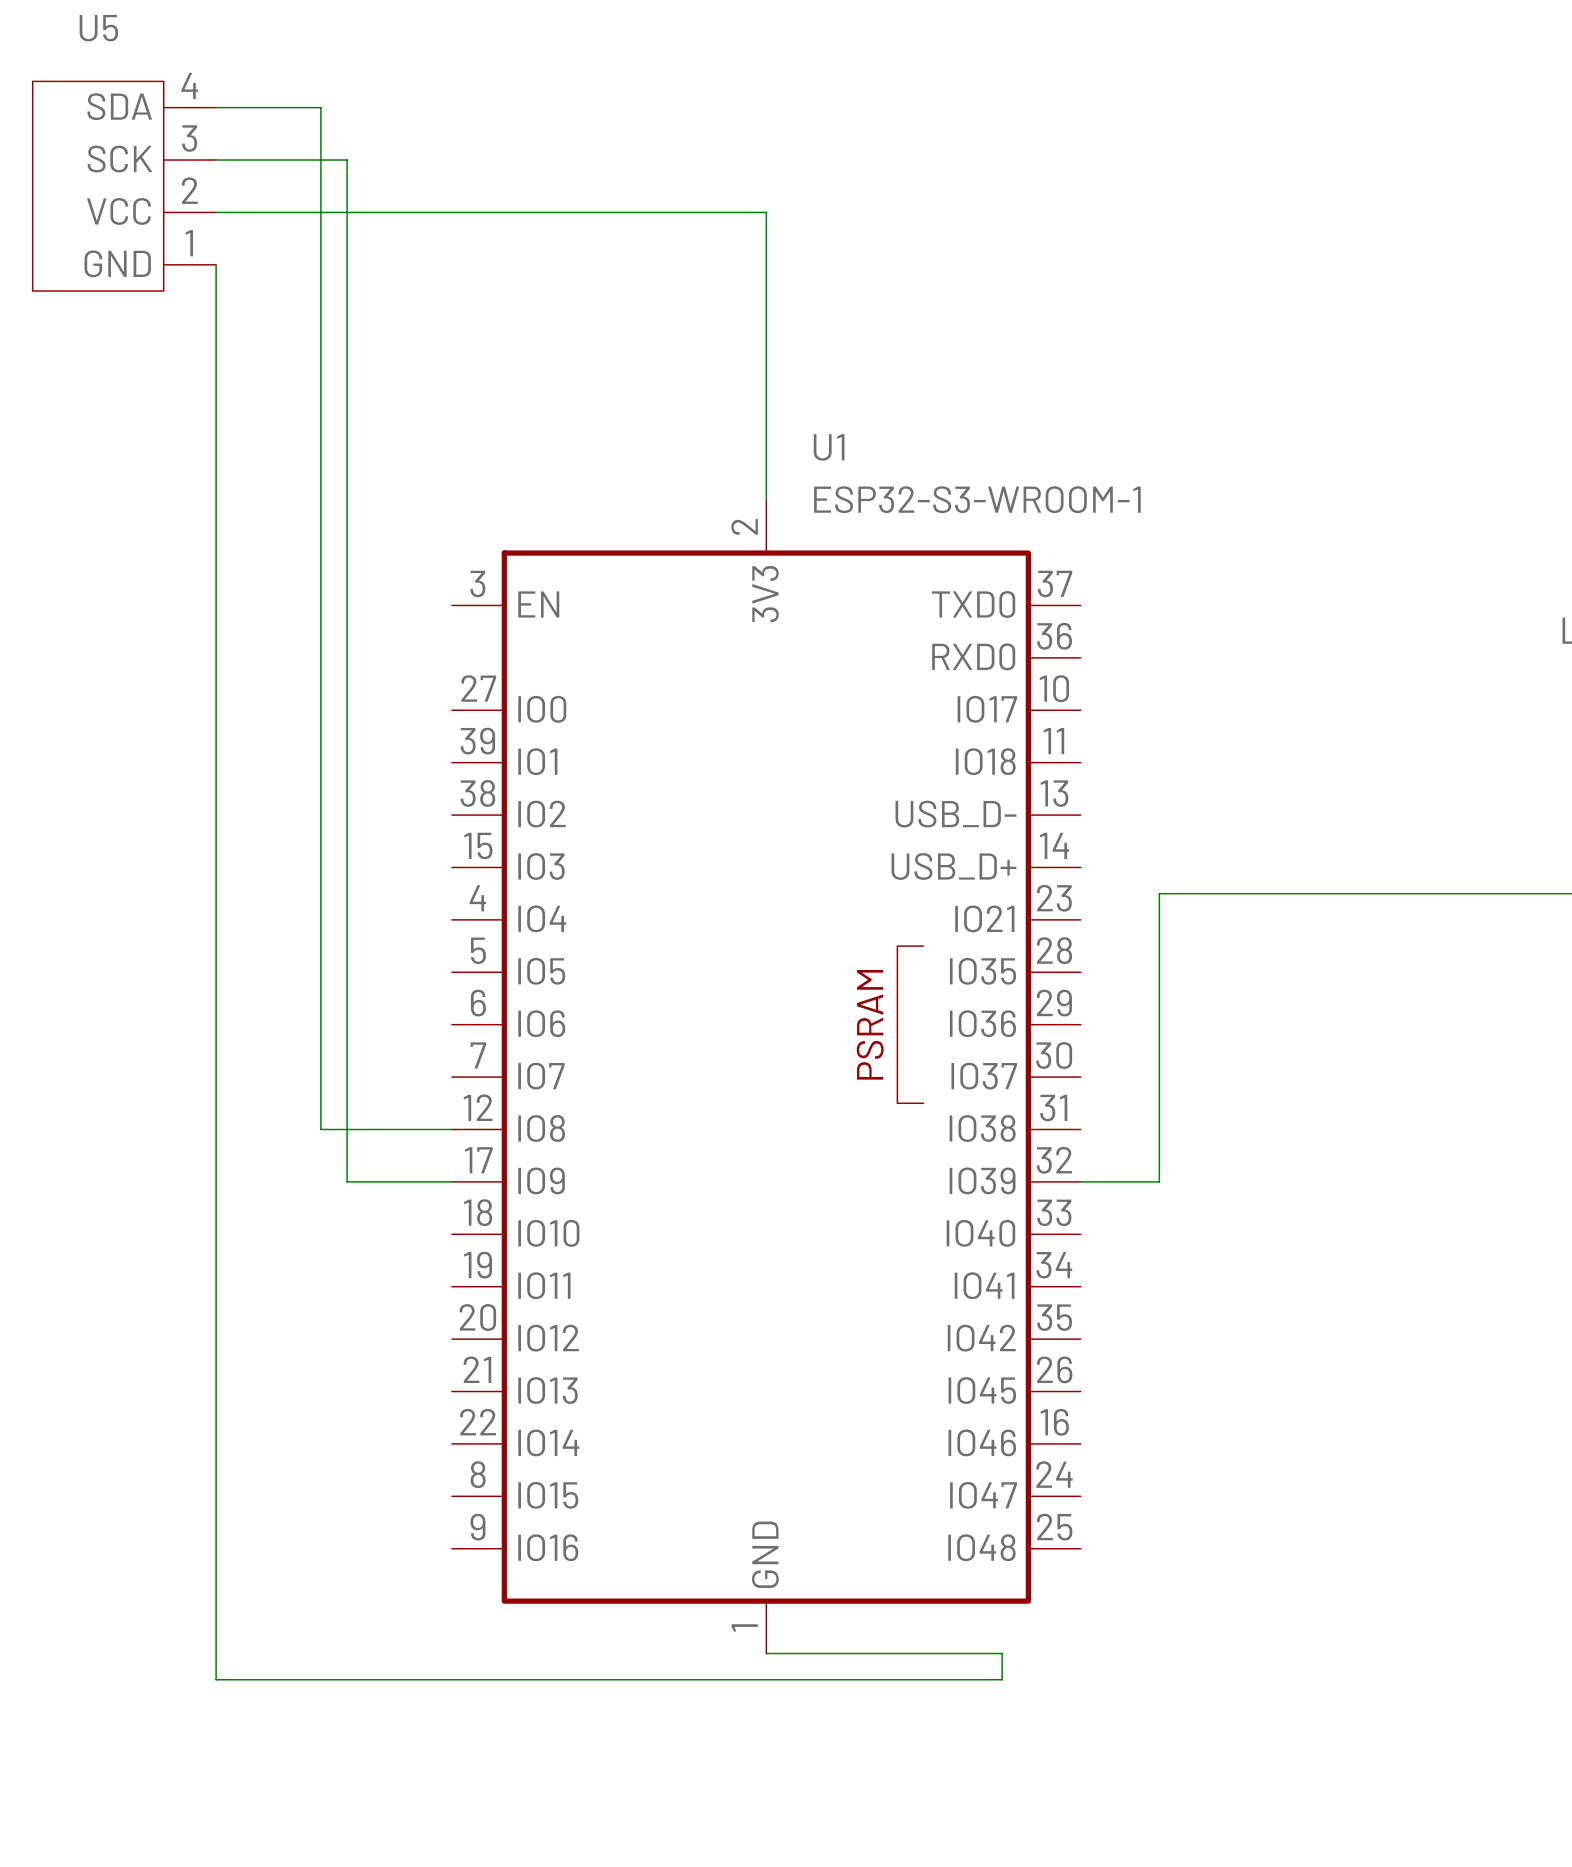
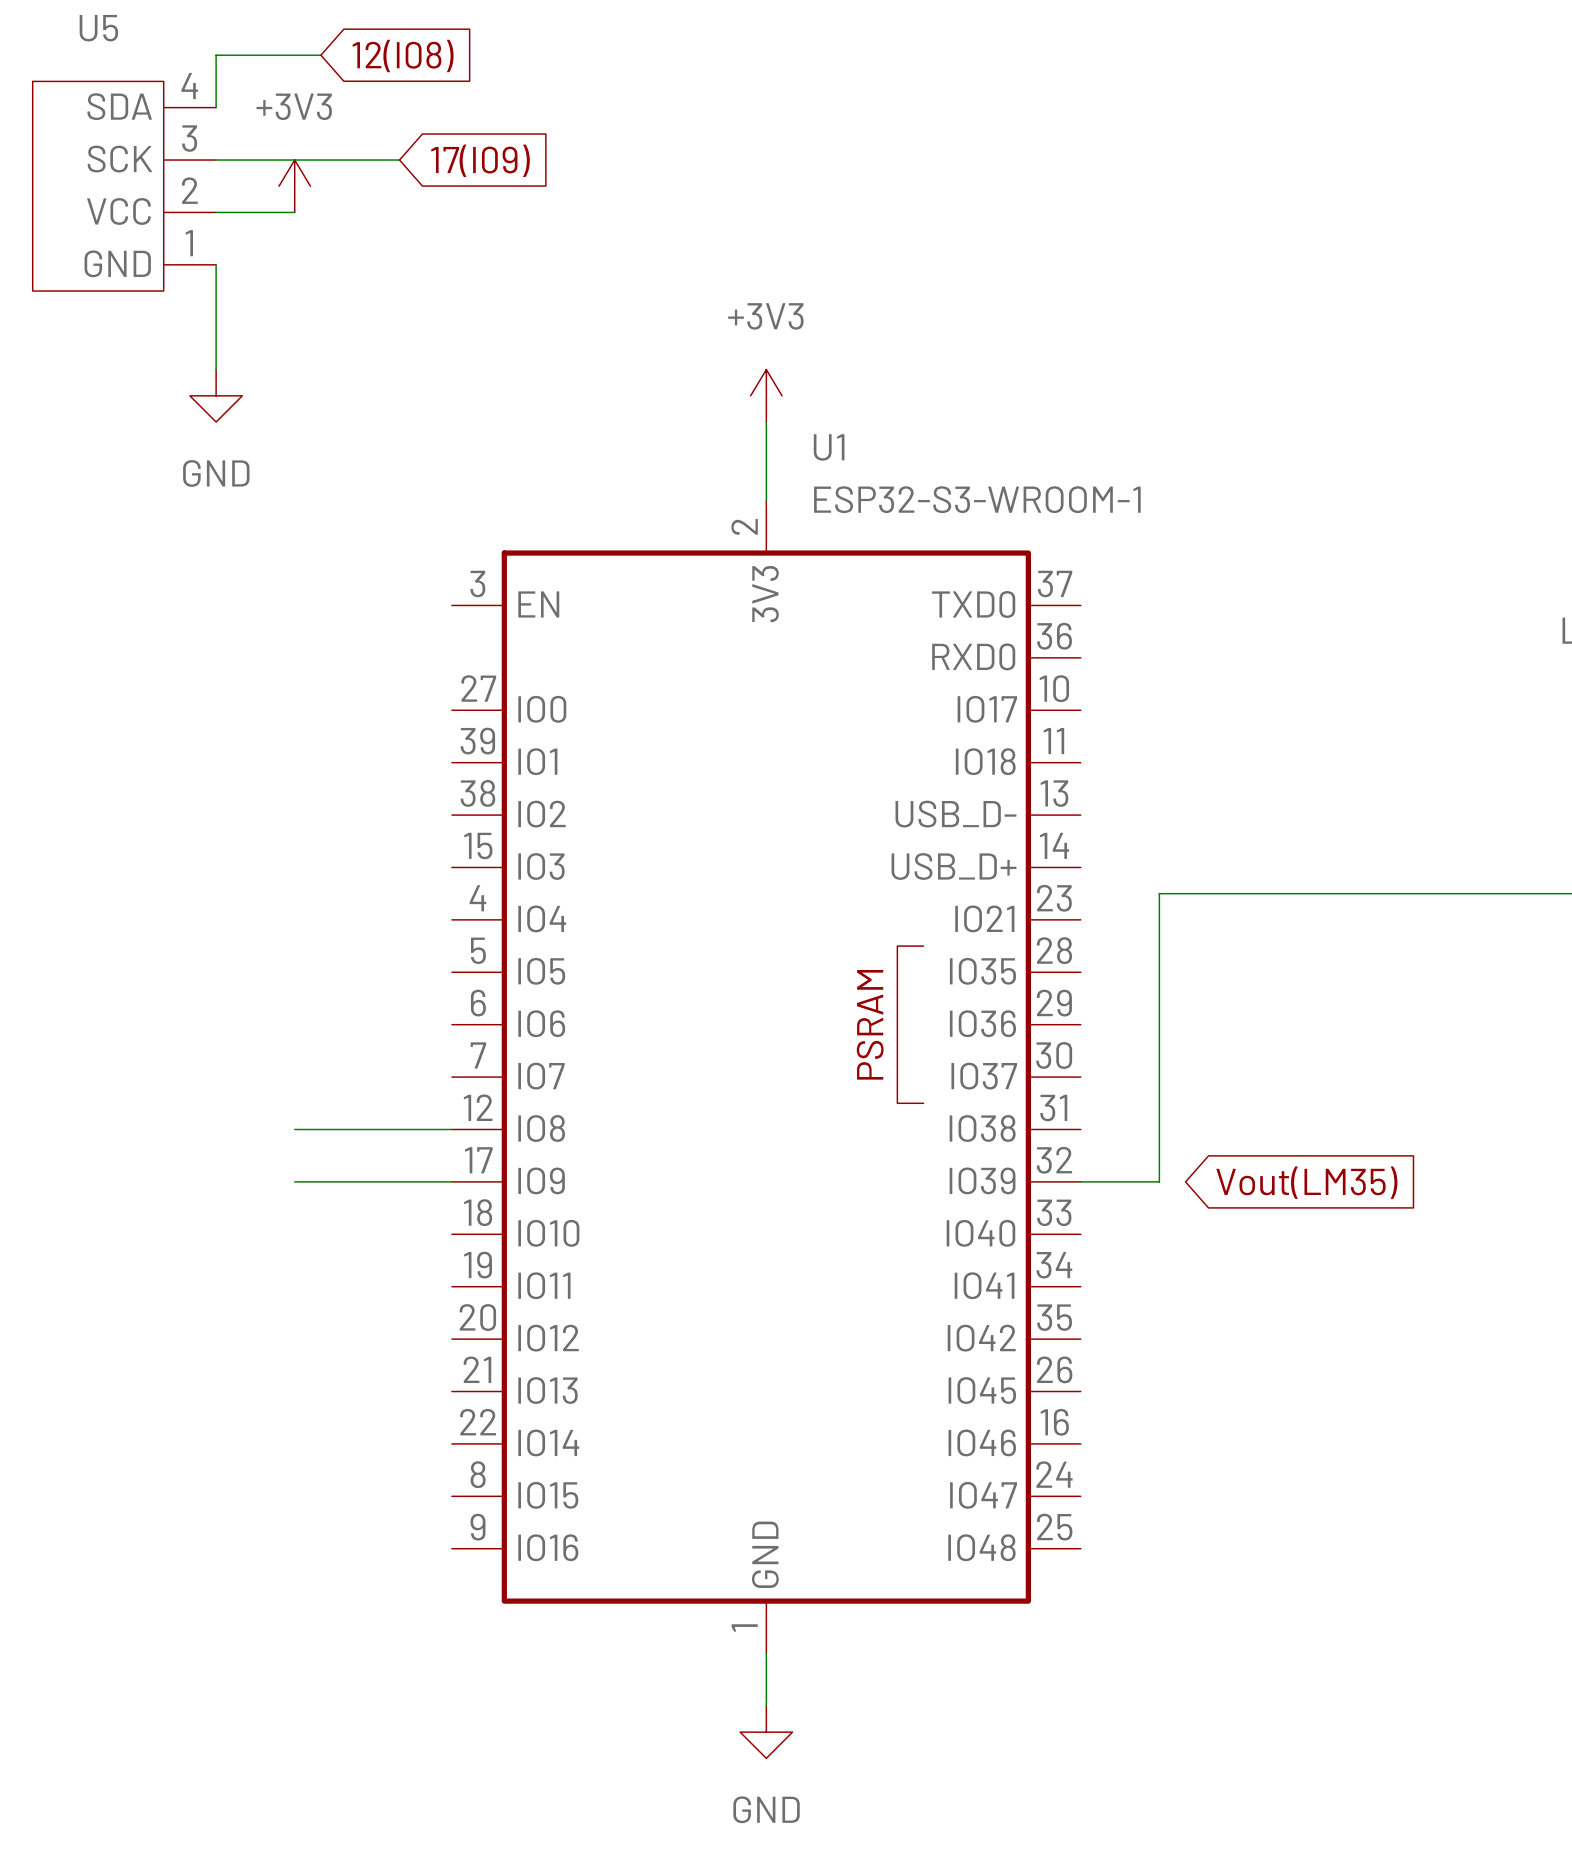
wire: none -> (320, 55) (216, 55) (216, 107)
global label: none -> 12(I08) (403, 55)
wire: (216, 107) (320, 107) (320, 1129) -> (294, 1129) (320, 1129)
wire: (347, 160) (347, 1181) -> (294, 1181) (347, 1181)
wire: none -> (347, 160) (399, 160)
global label: none -> 17(I09) (480, 160)
power symbol: none -> +3V3 (294, 186)
wire: (294, 212) (766, 212) (766, 422) -> none
wire: (216, 369) (216, 1679) (1002, 1679) (1002, 1653) (766, 1653) -> (766, 1705) (766, 1653)
power symbol: none -> GND (216, 395)
power symbol: none -> +3V3 (766, 395)
global label: none -> Vout(LM35) (1306, 1182)
power symbol: none -> GND (766, 1732)

